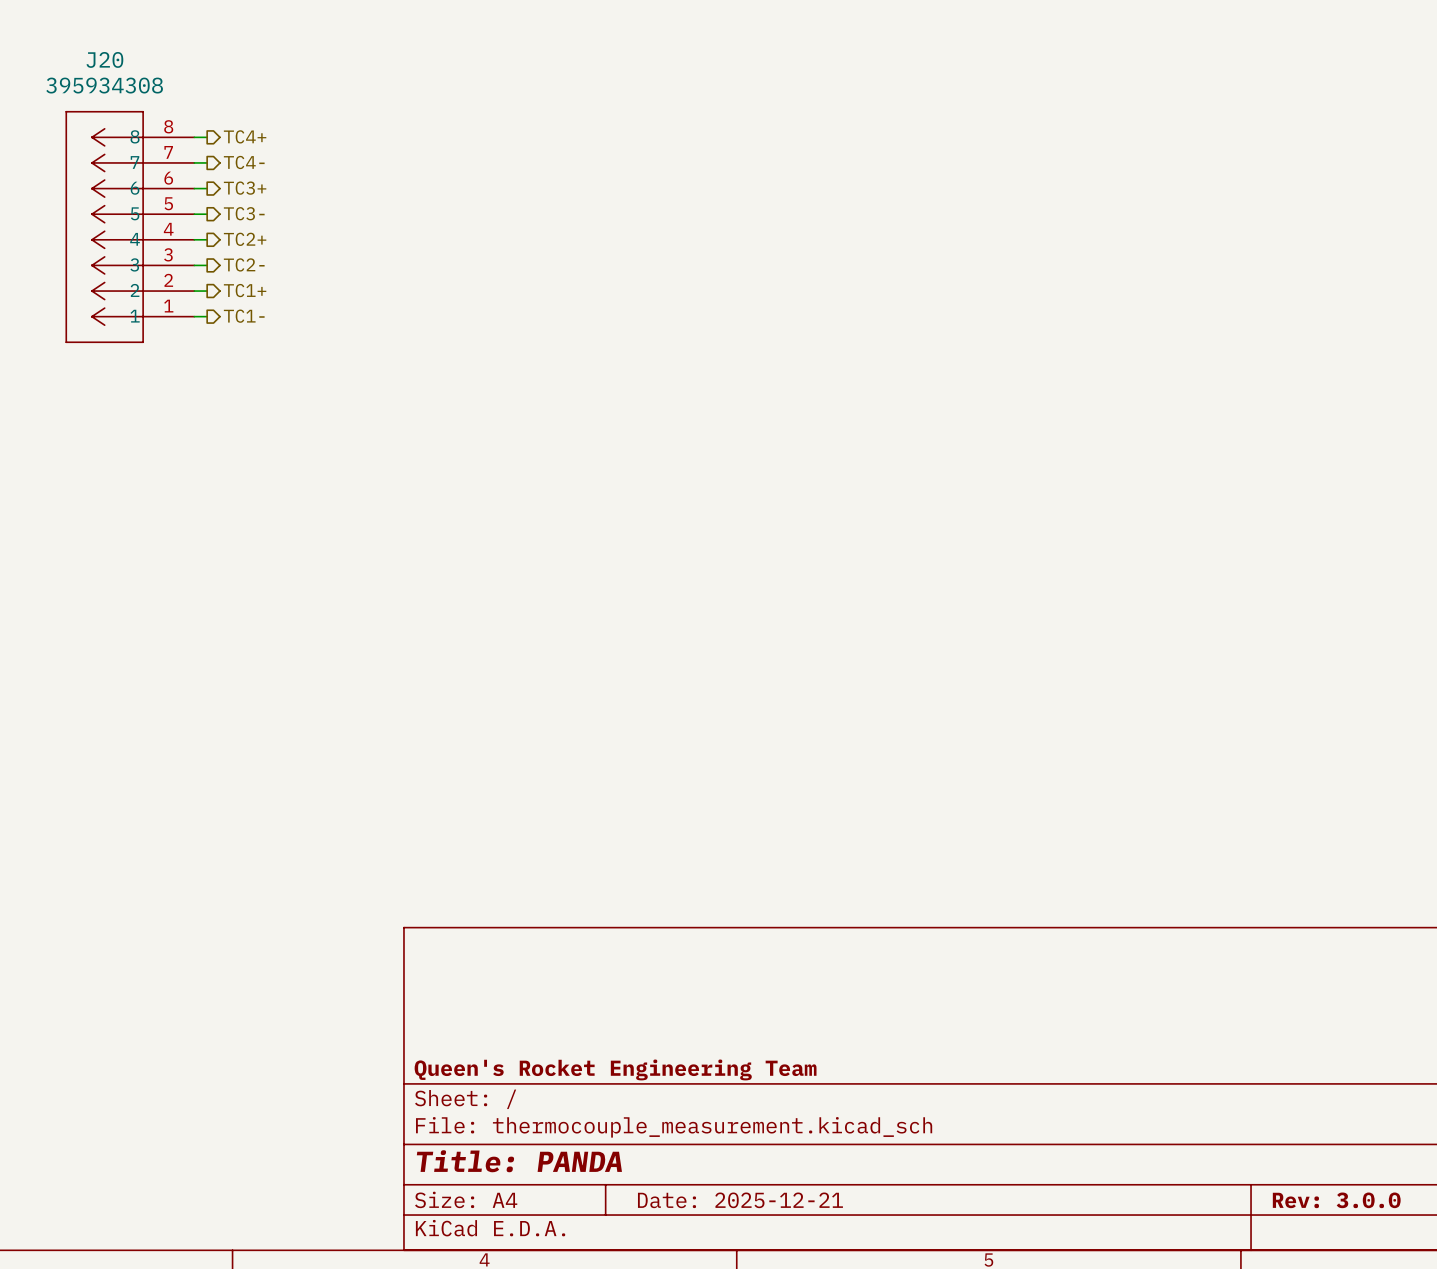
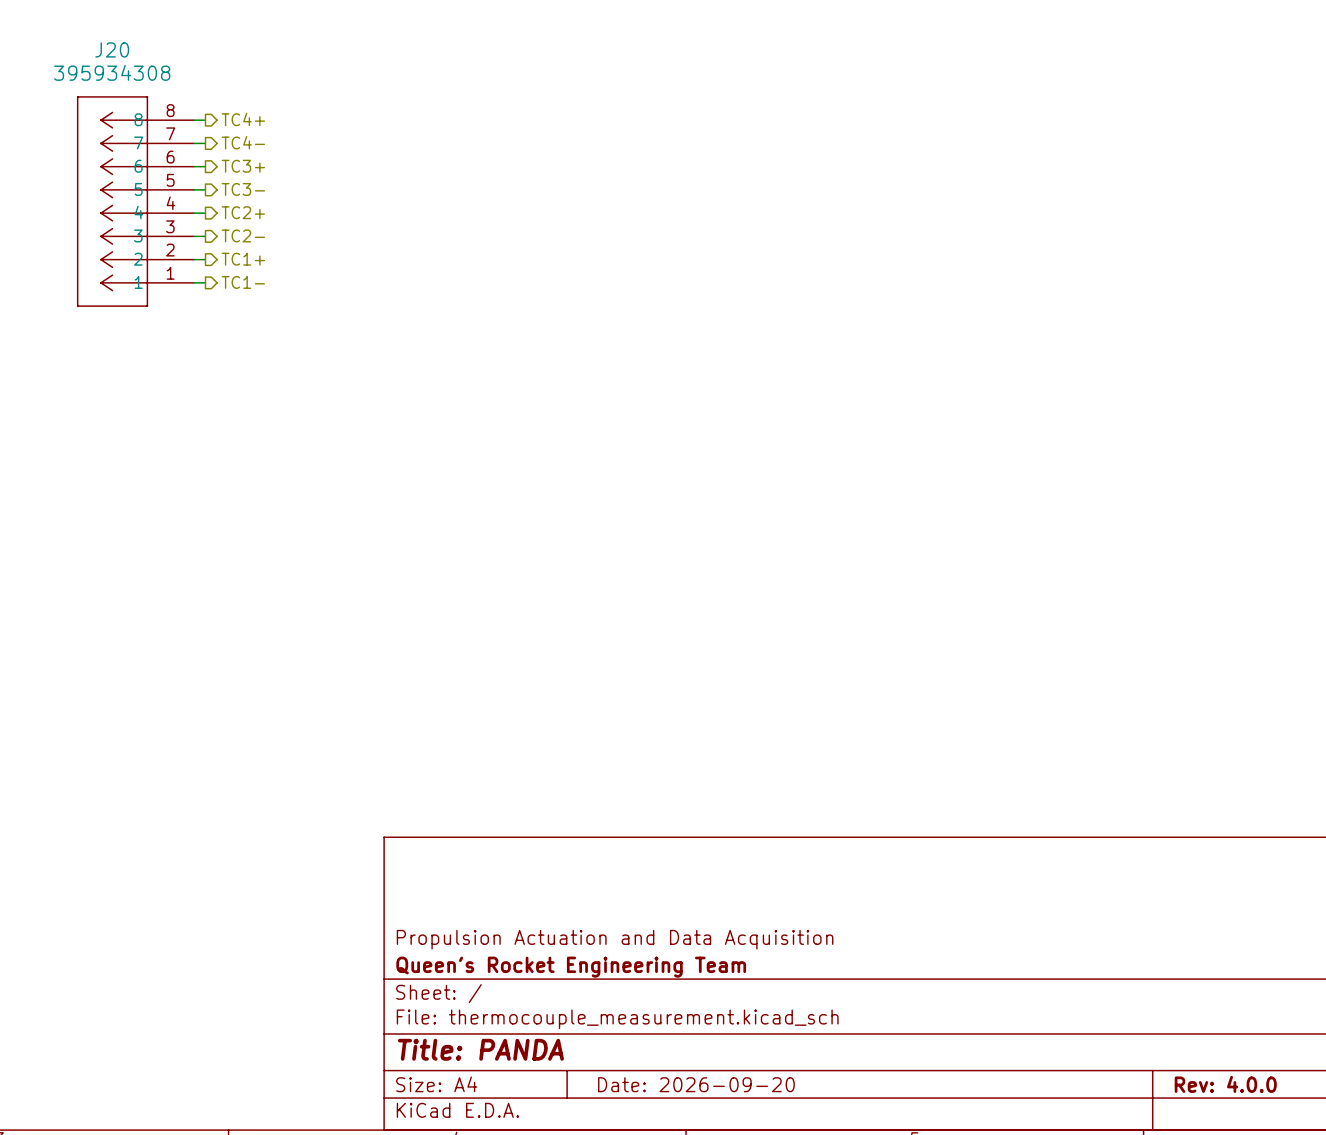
title block: none -> Propulsion Actuation and Data Acquisition (615, 939)
title block: Date: 2025-12-21 (740, 1200) -> Date: 2026-09-20 (696, 1084)
title block: Rev: 3.0.0 (1336, 1200) -> Rev: 4.0.0 (1225, 1084)

